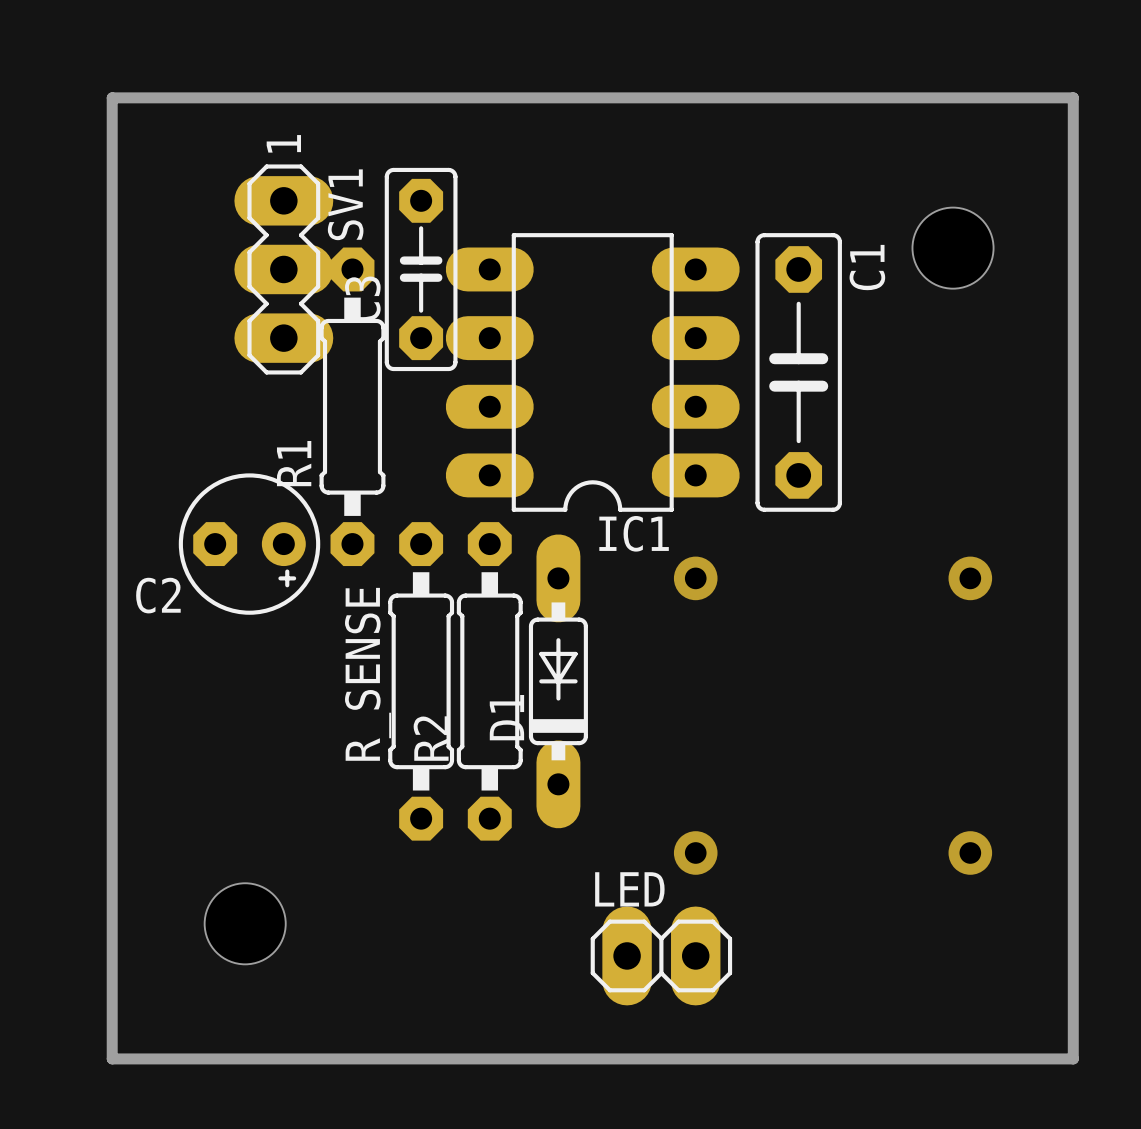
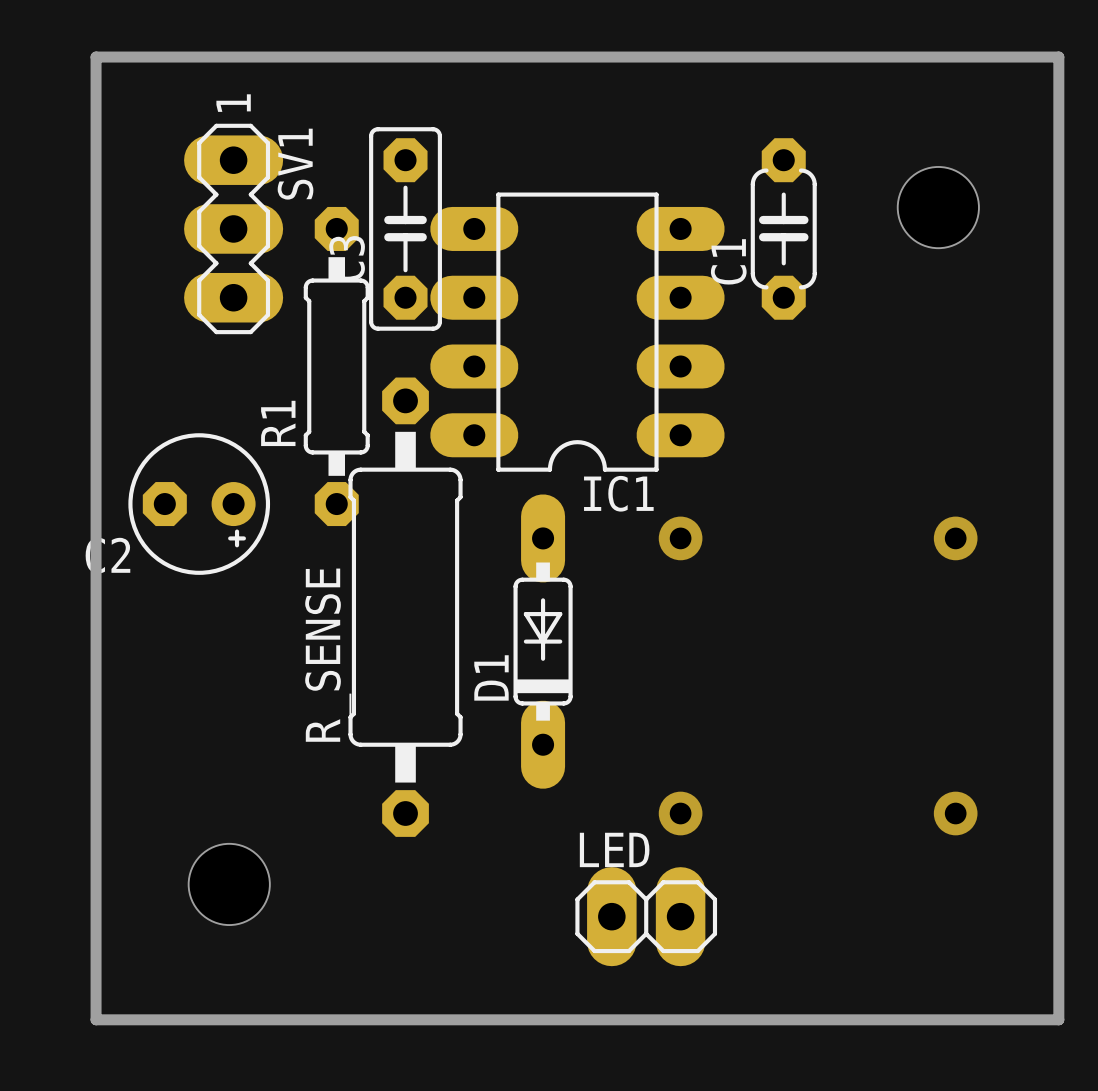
C1 footprint: [755, 233, 842, 512] -> [750, 138, 817, 320]
C1 name position: C1 (867, 267) -> C1 (728, 261)
SV1 position: (283, 269) -> (233, 228)
C2 position: (249, 544) -> (199, 504)
R_SENSE: none -> (405, 607)
R_SENSE: (421, 681) -> none
R2: (489, 681) -> none

